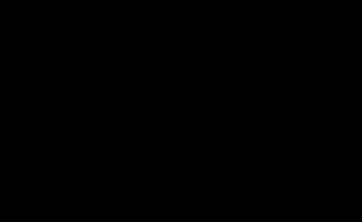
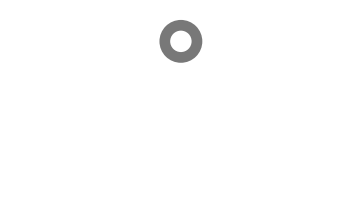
via: none -> (180, 41)

